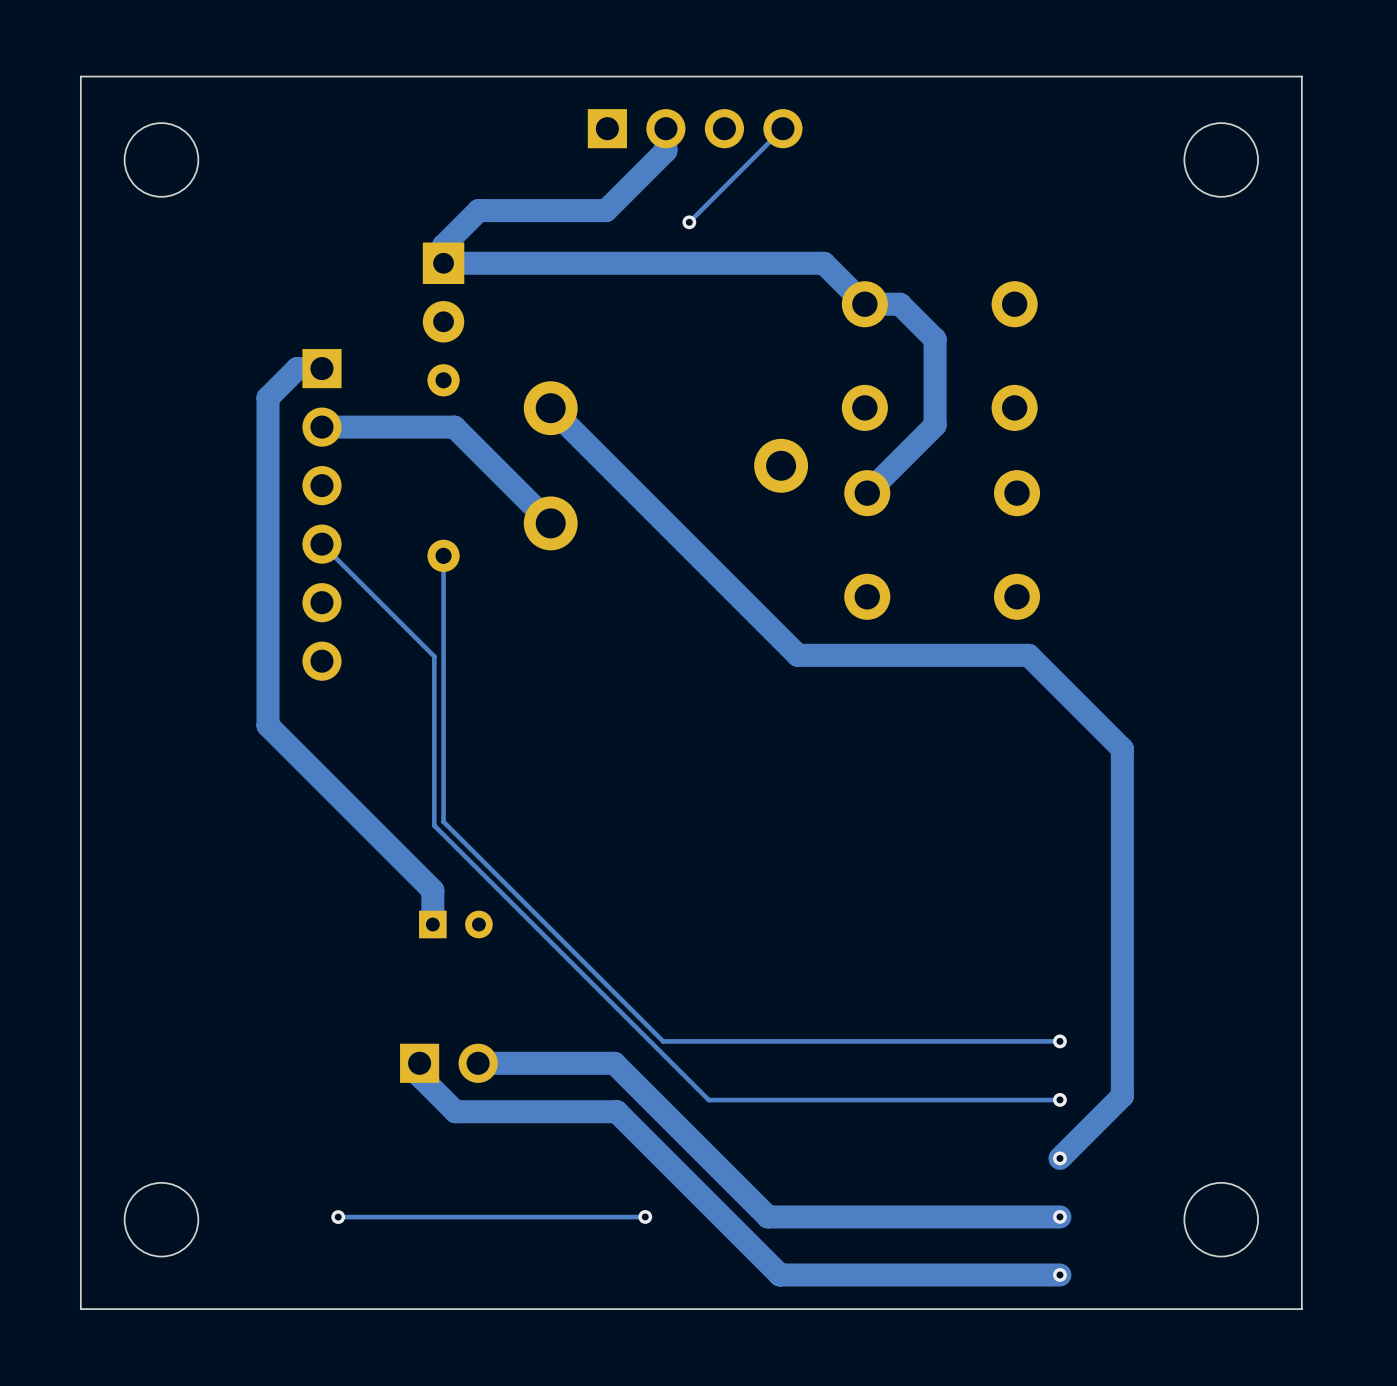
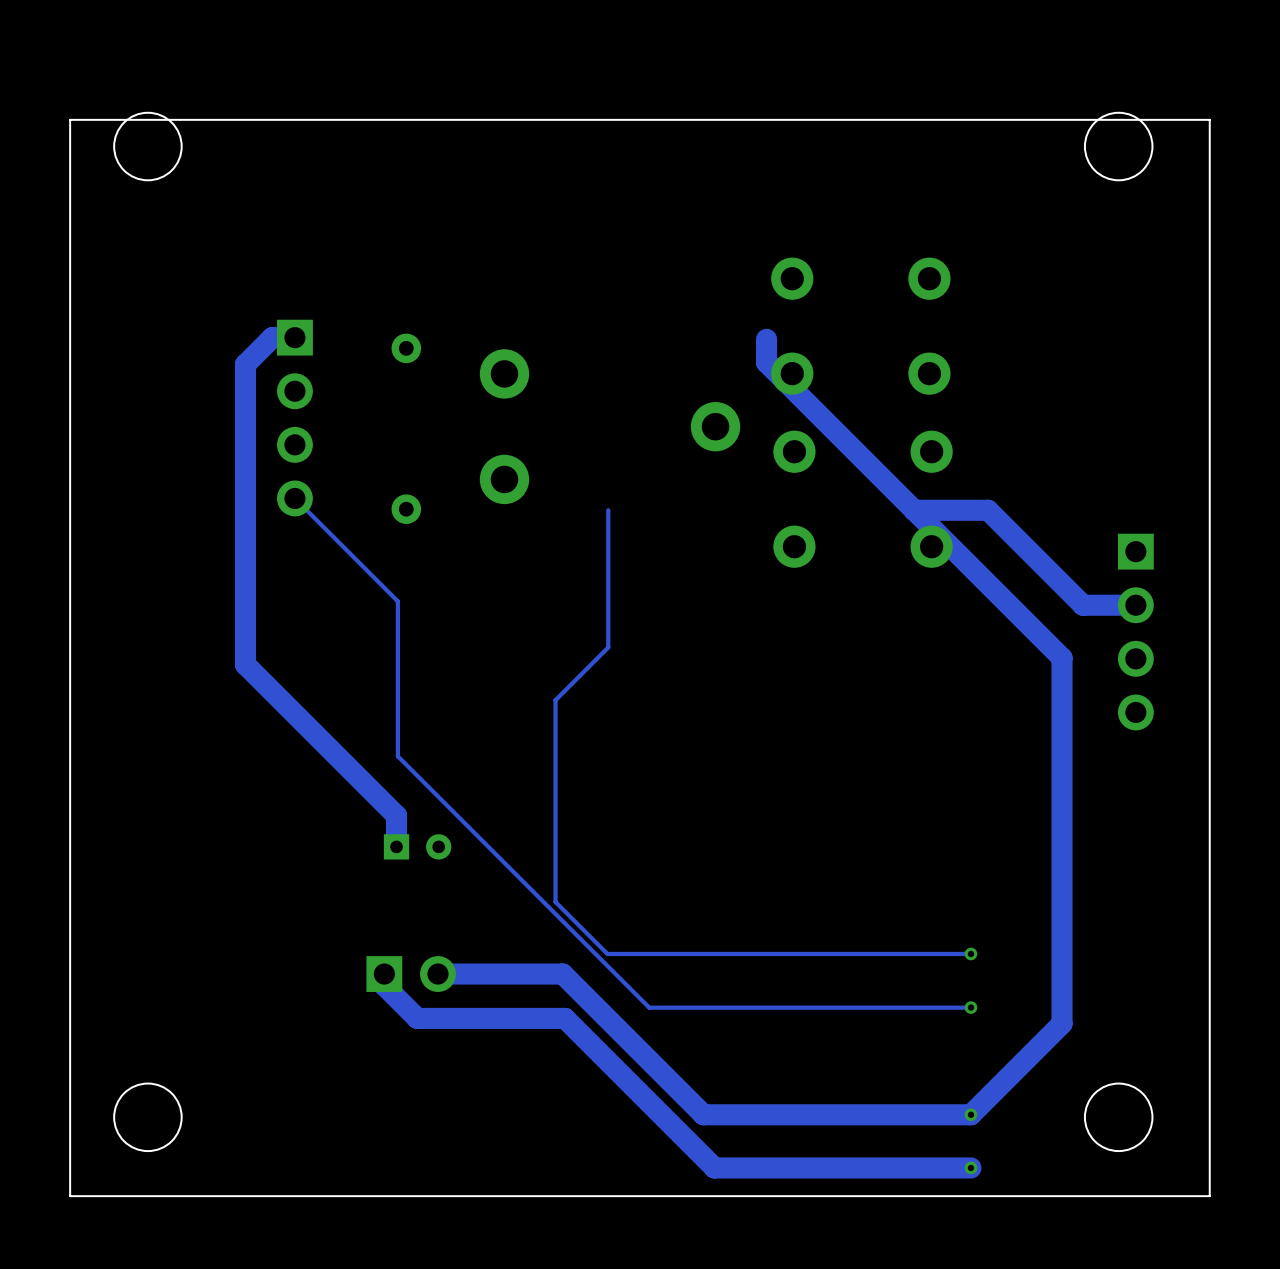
board edge: (1301, 76) (80, 76) (80, 1309) (1301, 1309) (1301, 76) -> (1209, 119) (1209, 1196) (70, 1196) (70, 119) (1209, 119)
track: (665, 128) (665, 150) (606, 210) (478, 210) (443, 245) (443, 263) (823, 263) (864, 304) (899, 304) (935, 339) (935, 425) (867, 493) -> none
part: (695, 128) -> none
track: (782, 128) (689, 222) -> none
via: (689, 222) -> none
part: (443, 292) -> none
track: none -> (766, 339) (766, 362) (1062, 658) (1062, 1023) (970, 1114)
track: (550, 408) (797, 655) (1028, 655) (1122, 748) (1122, 1096) (1059, 1158) -> none
track: (321, 427) (454, 427) (550, 523) -> none
part: none -> (294, 418)
part: (321, 514) -> none
track: (443, 555) (443, 821) (606, 984) -> (608, 510) (608, 647) (555, 700) (555, 902)
track: none -> (914, 510) (988, 510) (1083, 605) (1135, 605)
part: none -> (1135, 632)
via: (1059, 1158) -> none
via: (645, 1216) -> none
via: (338, 1217) -> none
track: (645, 1217) (338, 1217) -> none

